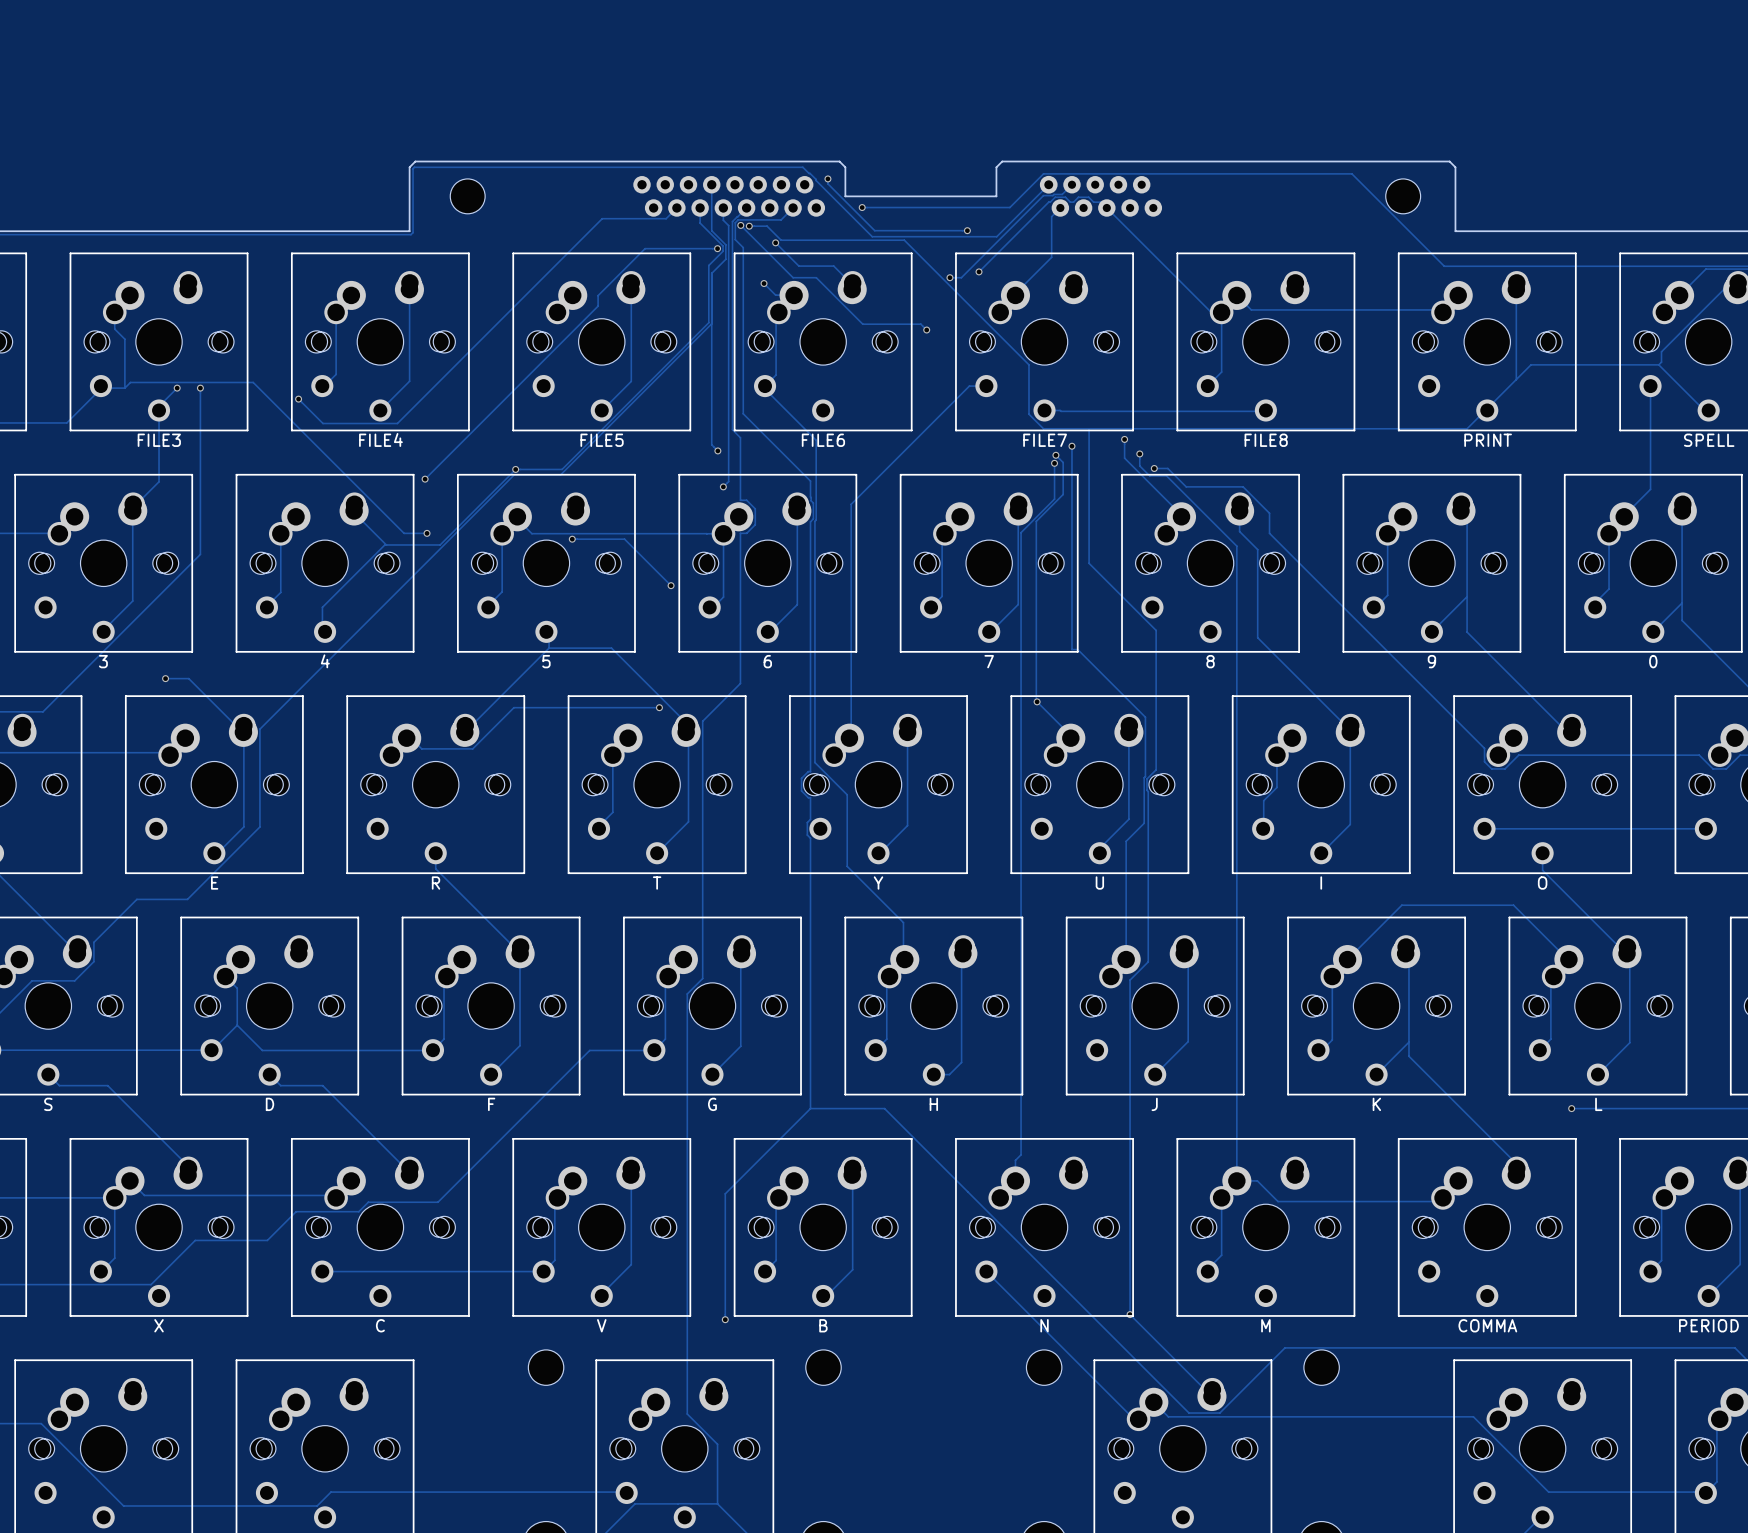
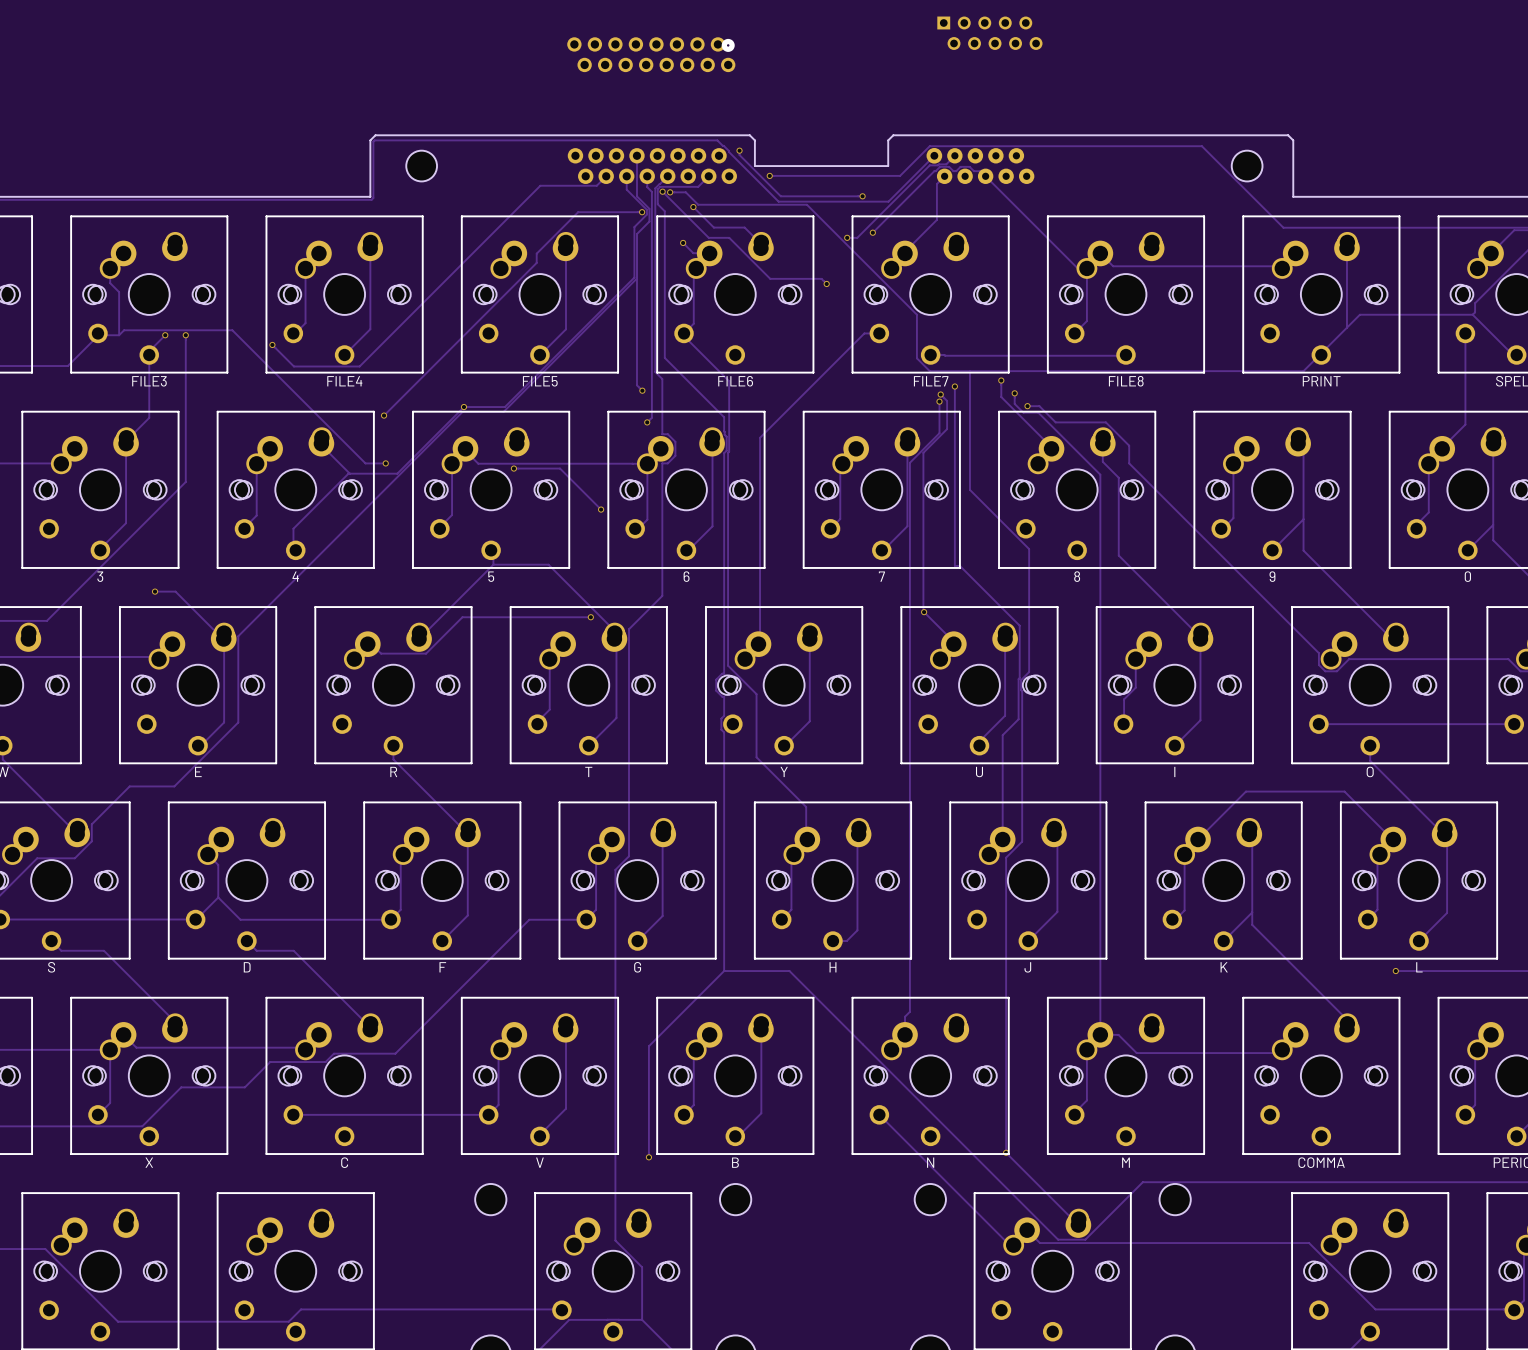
part: none -> (989, 33)
part: none -> (651, 54)

